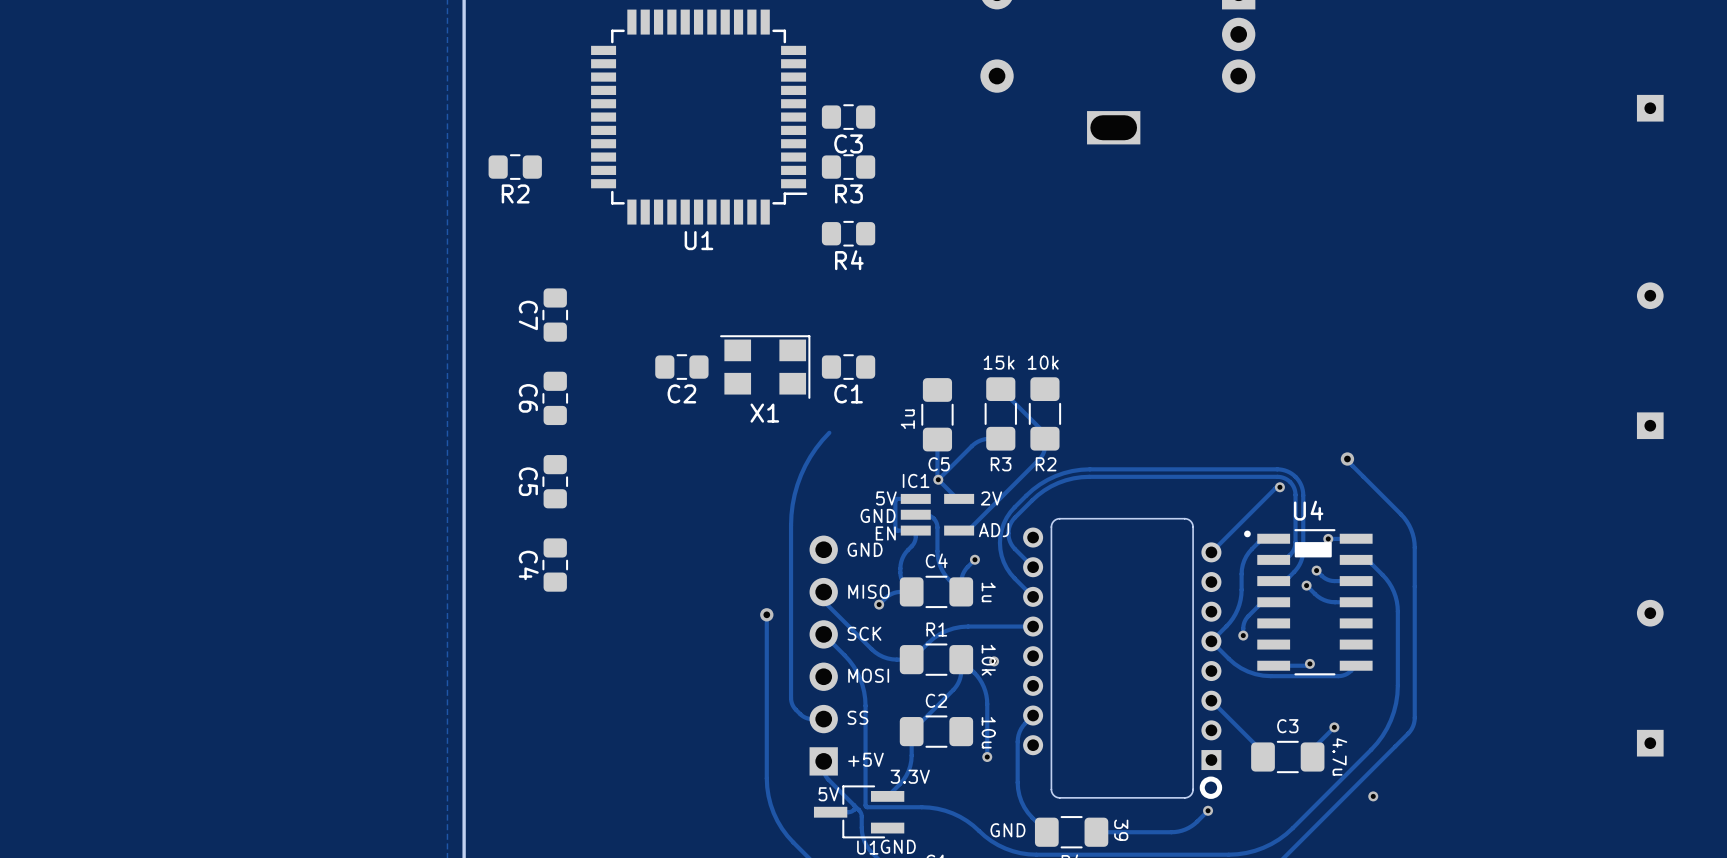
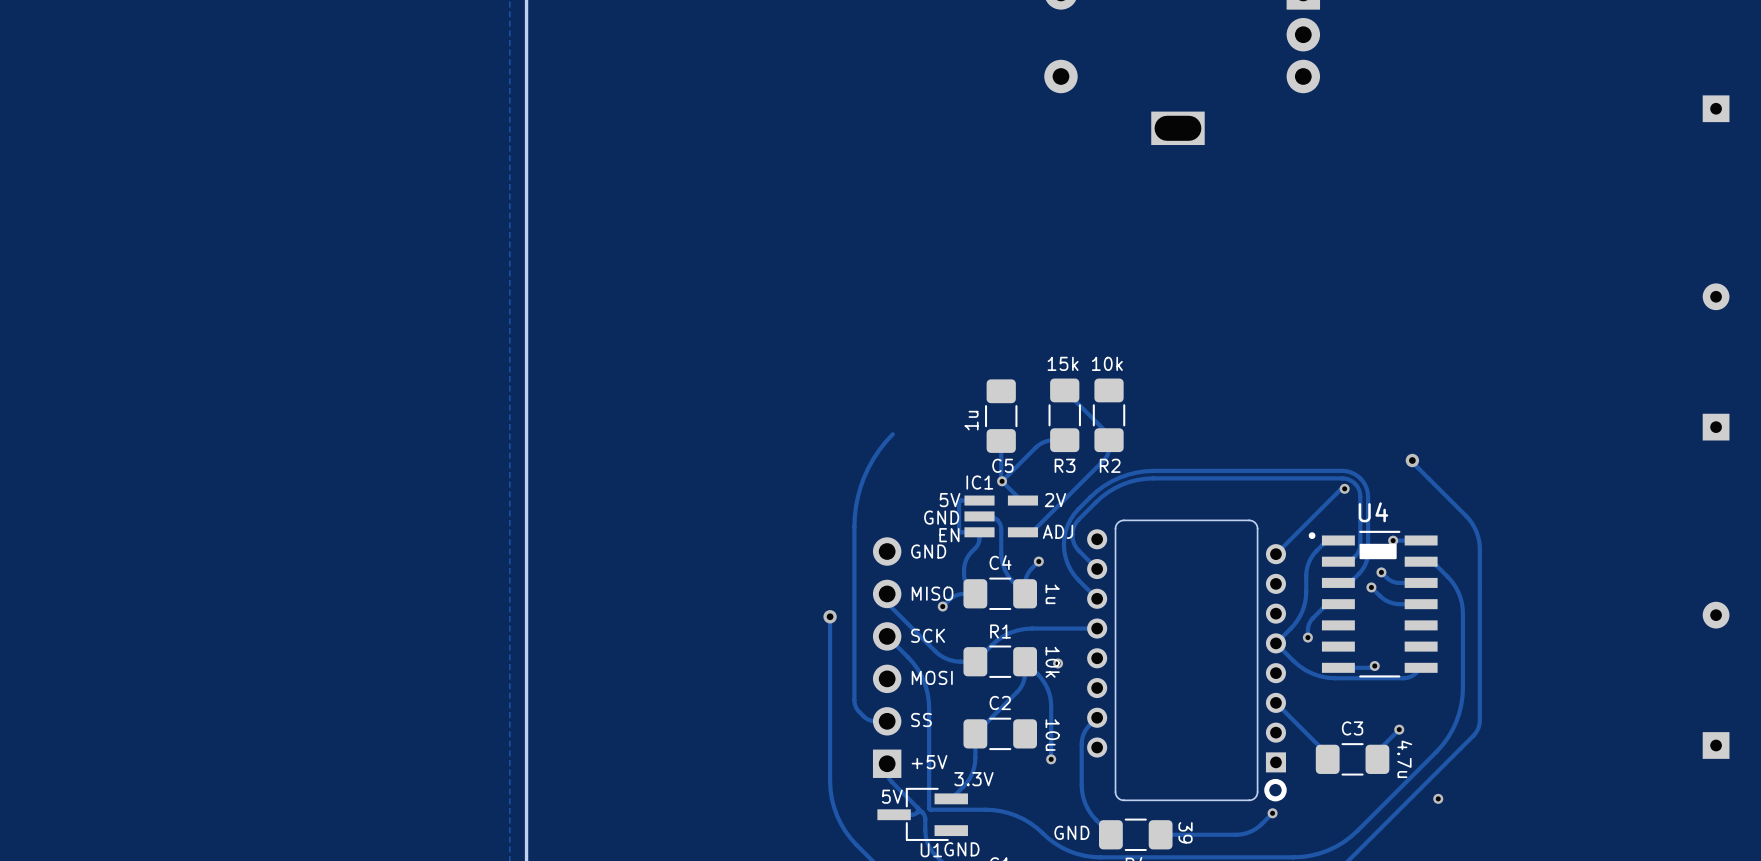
U1: (699, 117) -> none
C3: (848, 117) -> none
R2: (515, 167) -> none
R3: (848, 167) -> none
R4: (848, 233) -> none
C7: (555, 315) -> none
C2: (681, 367) -> none
X1: (765, 367) -> none
C1: (848, 367) -> none
C6: (555, 398) -> none
C5: (555, 481) -> none
C4: (555, 565) -> none

